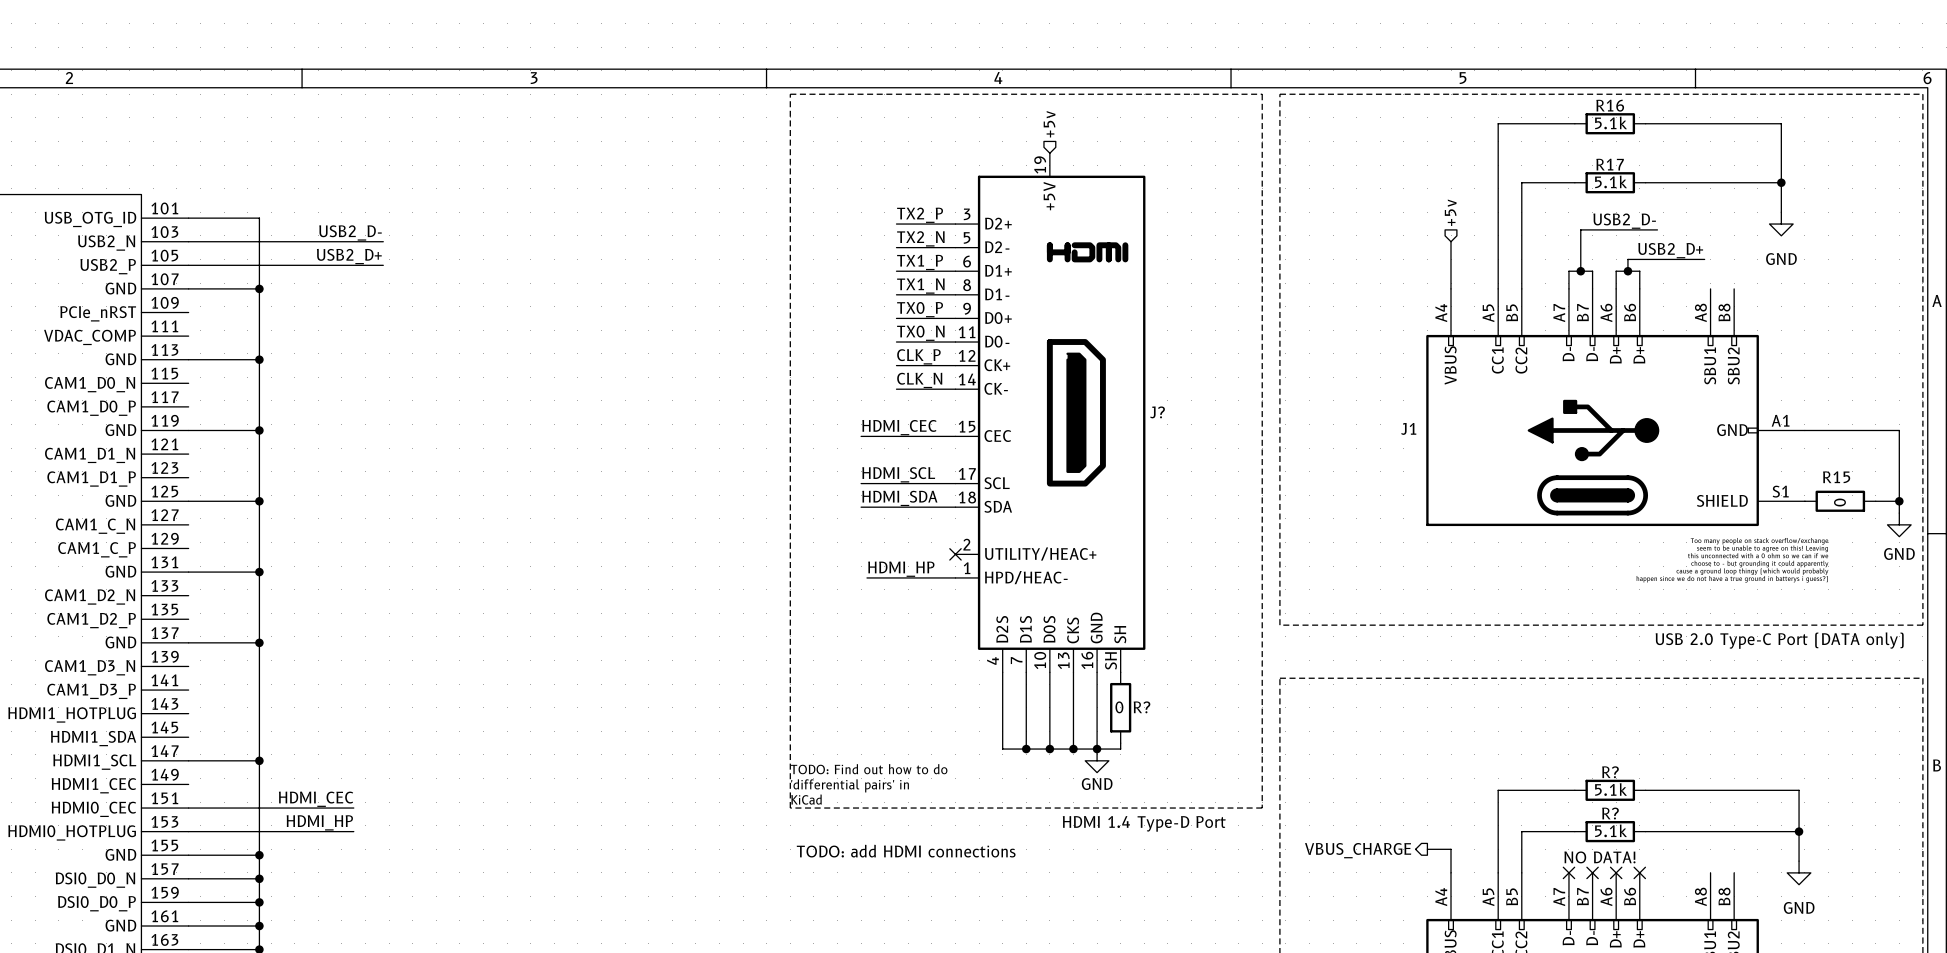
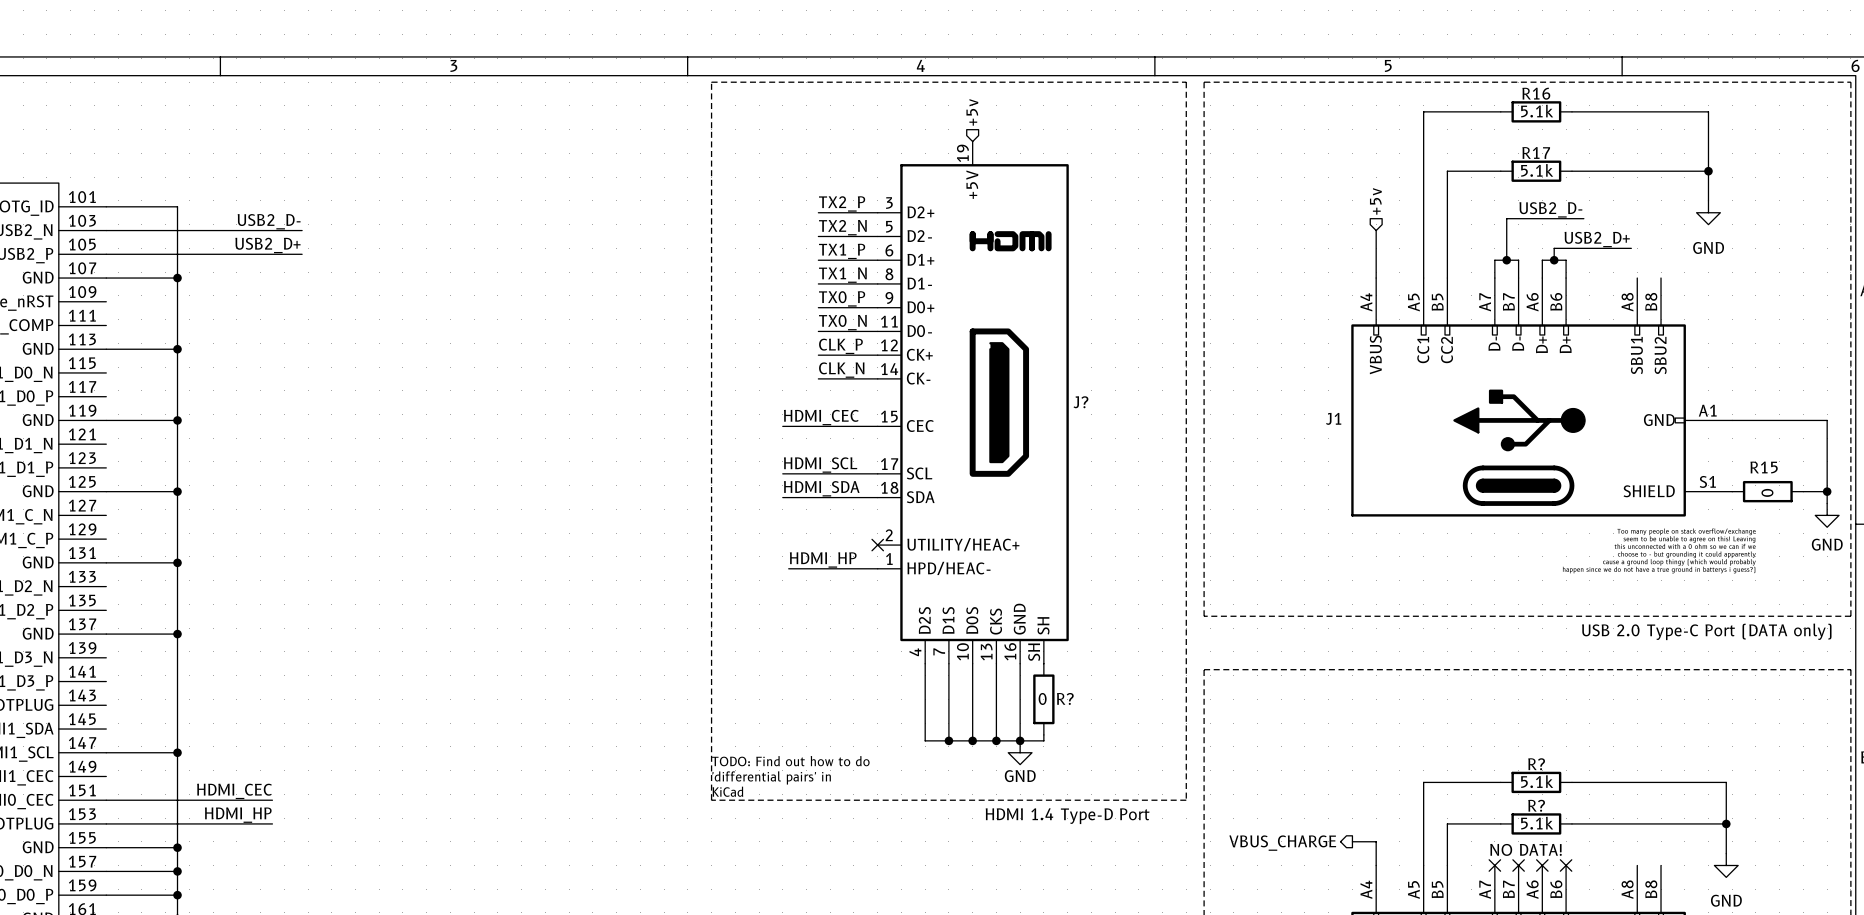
text: TODO: add HDMI connections (906, 851) -> none

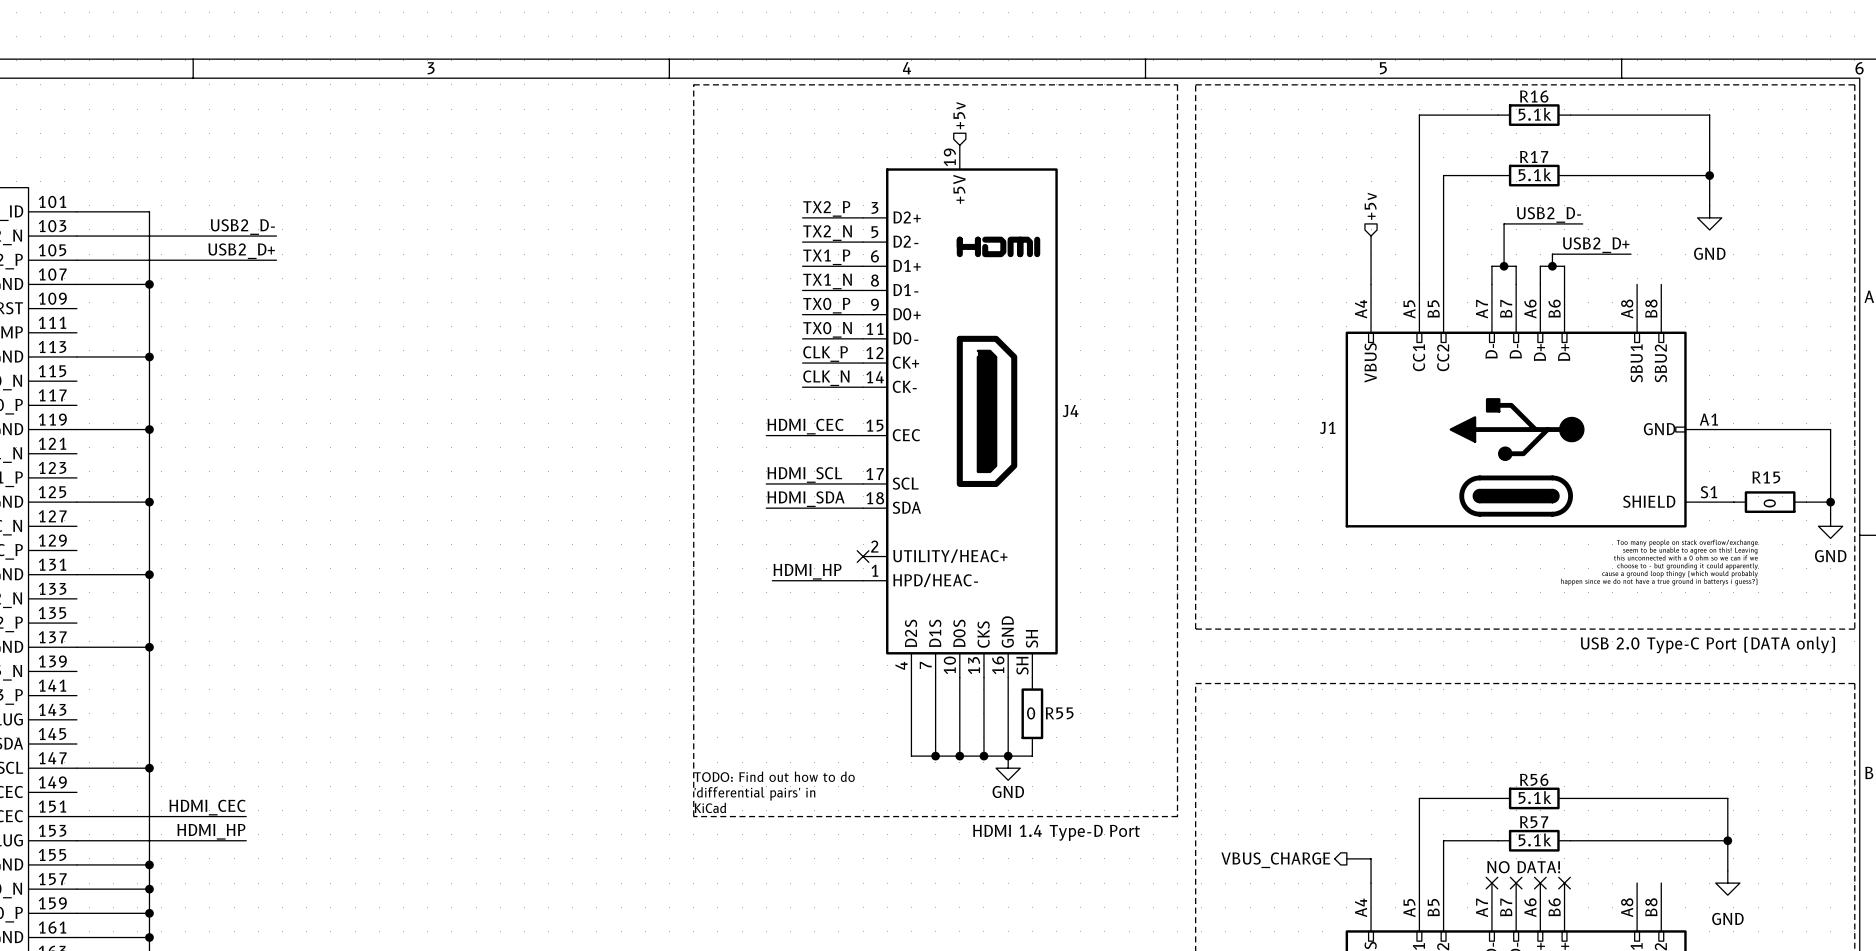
J? name: J? (1080, 402) -> J4 (1070, 411)
R? name: R? (1065, 698) -> R55 (1059, 713)
R? name: R? (1536, 764) -> R56 (1534, 779)
R? name: R? (1536, 805) -> R57 (1534, 822)

